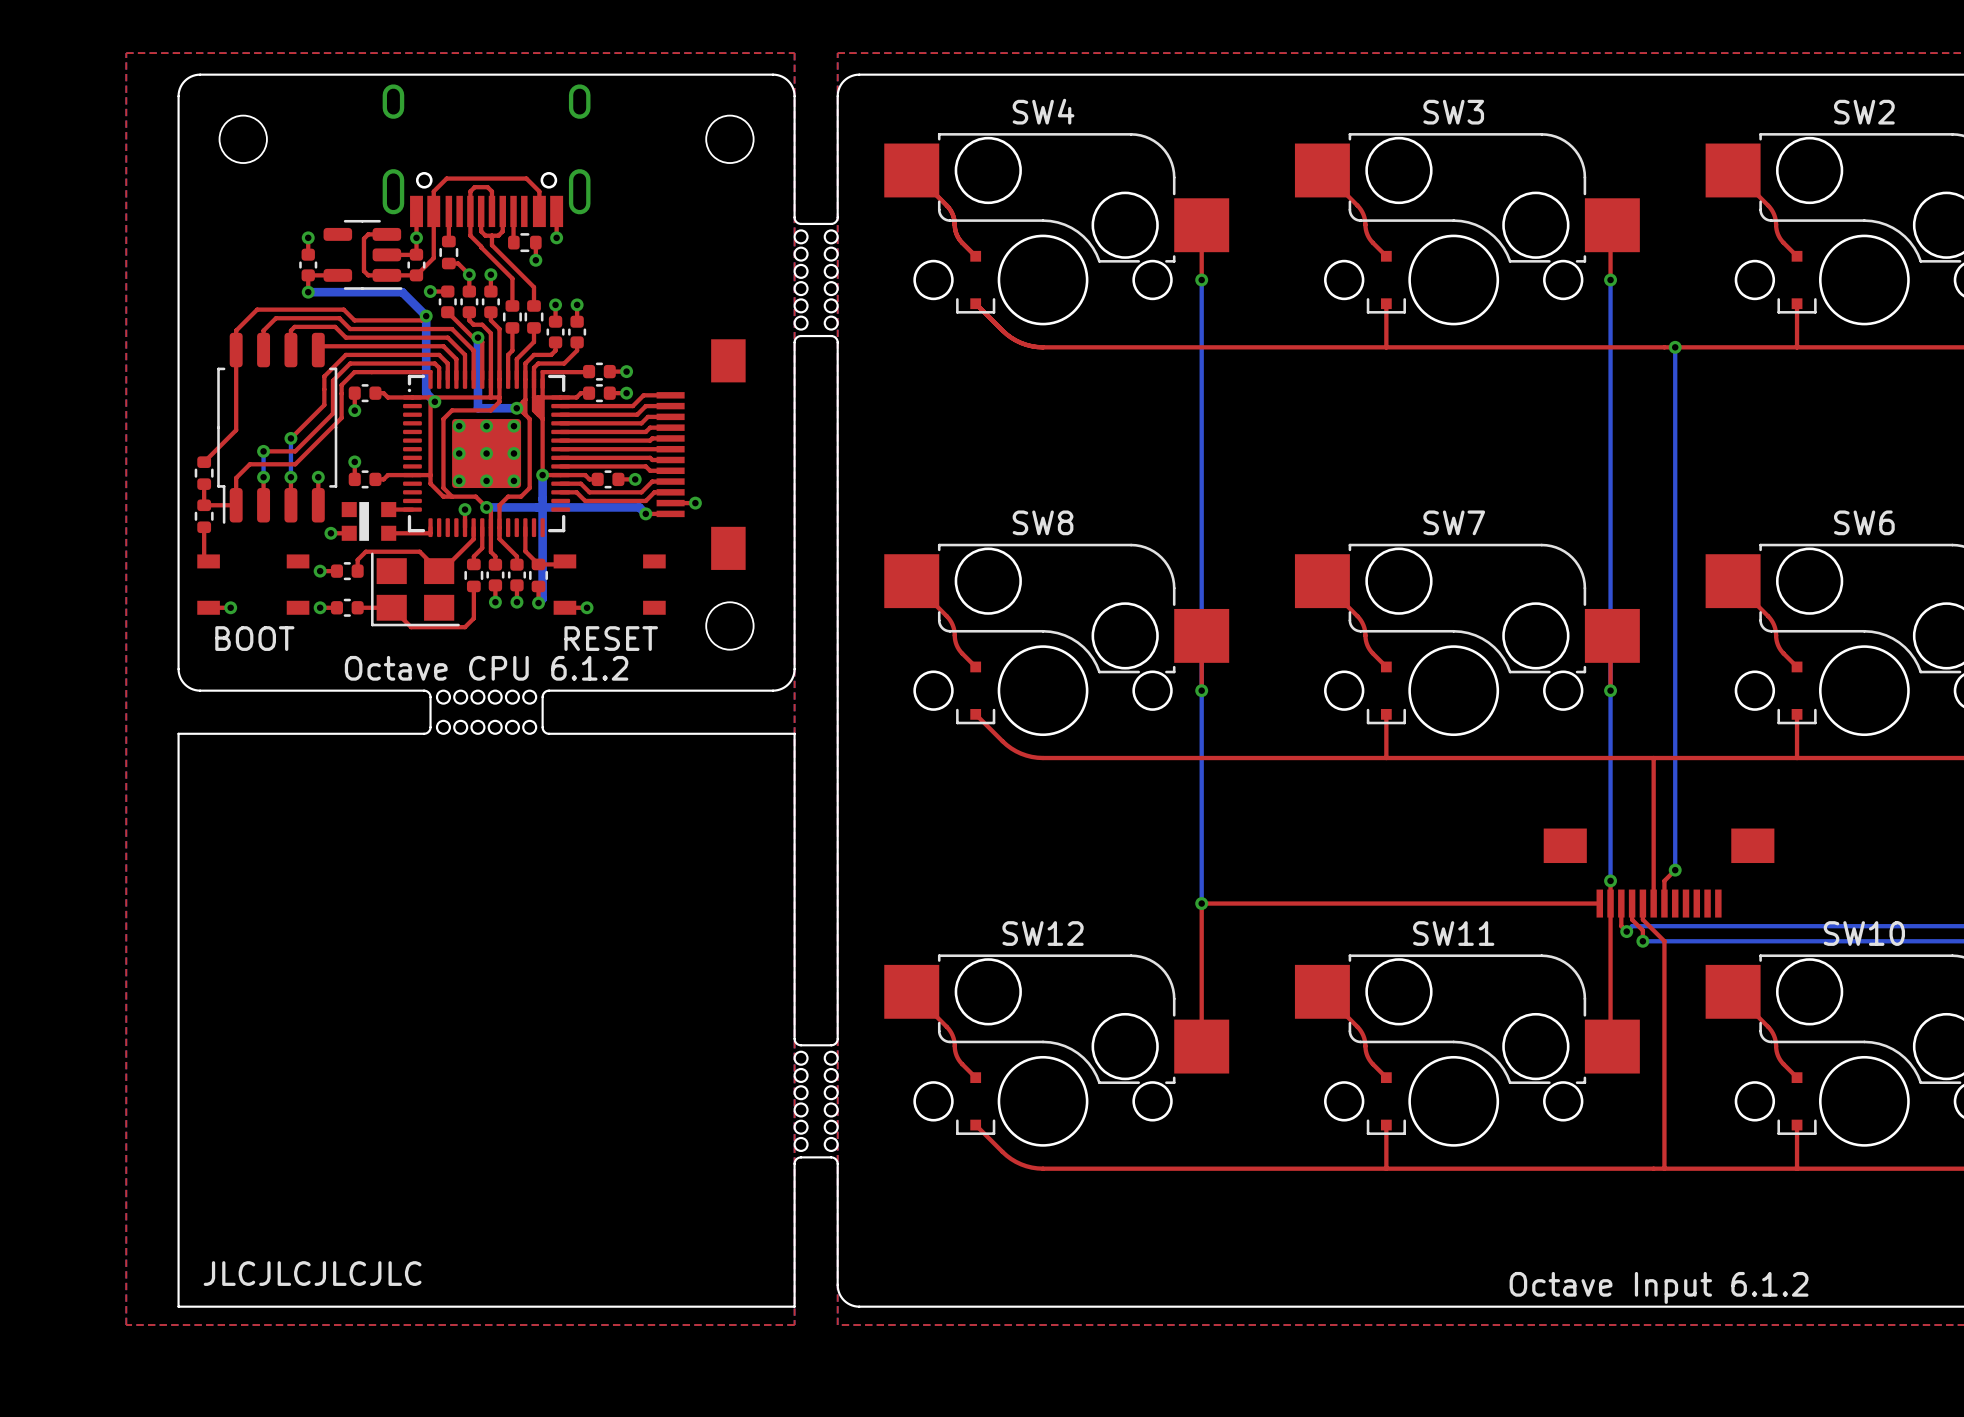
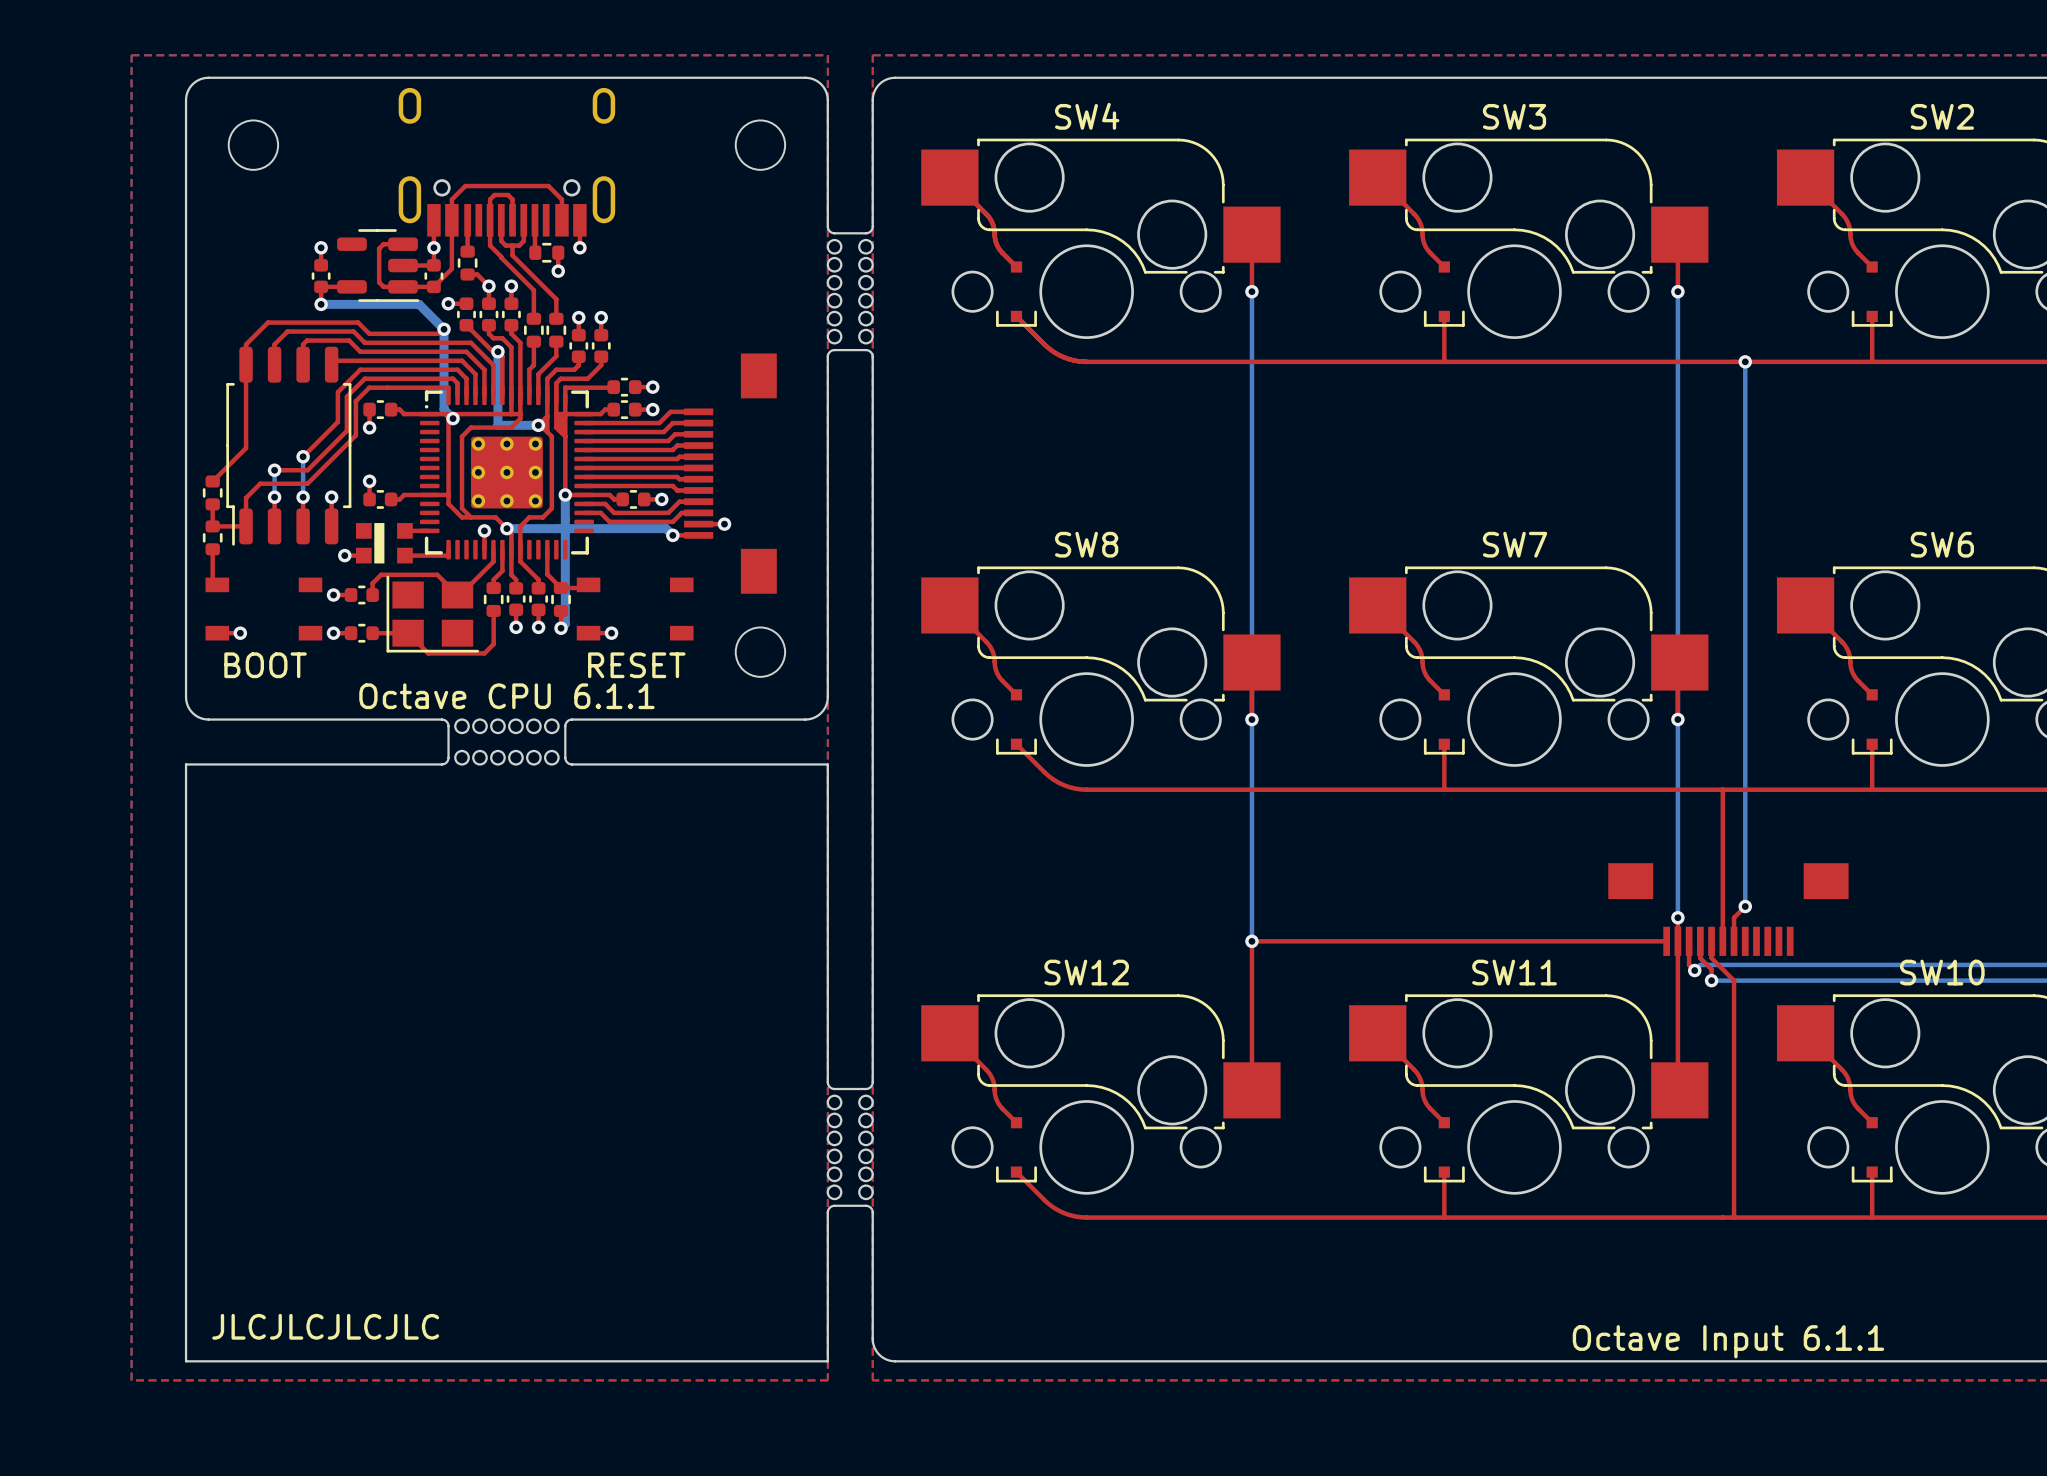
text: Octave CPU 6.1.2 (486, 668) -> Octave CPU 6.1.1 (506, 696)
text: Octave Input 6.1.2 (1659, 1287) -> Octave Input 6.1.1 (1728, 1341)

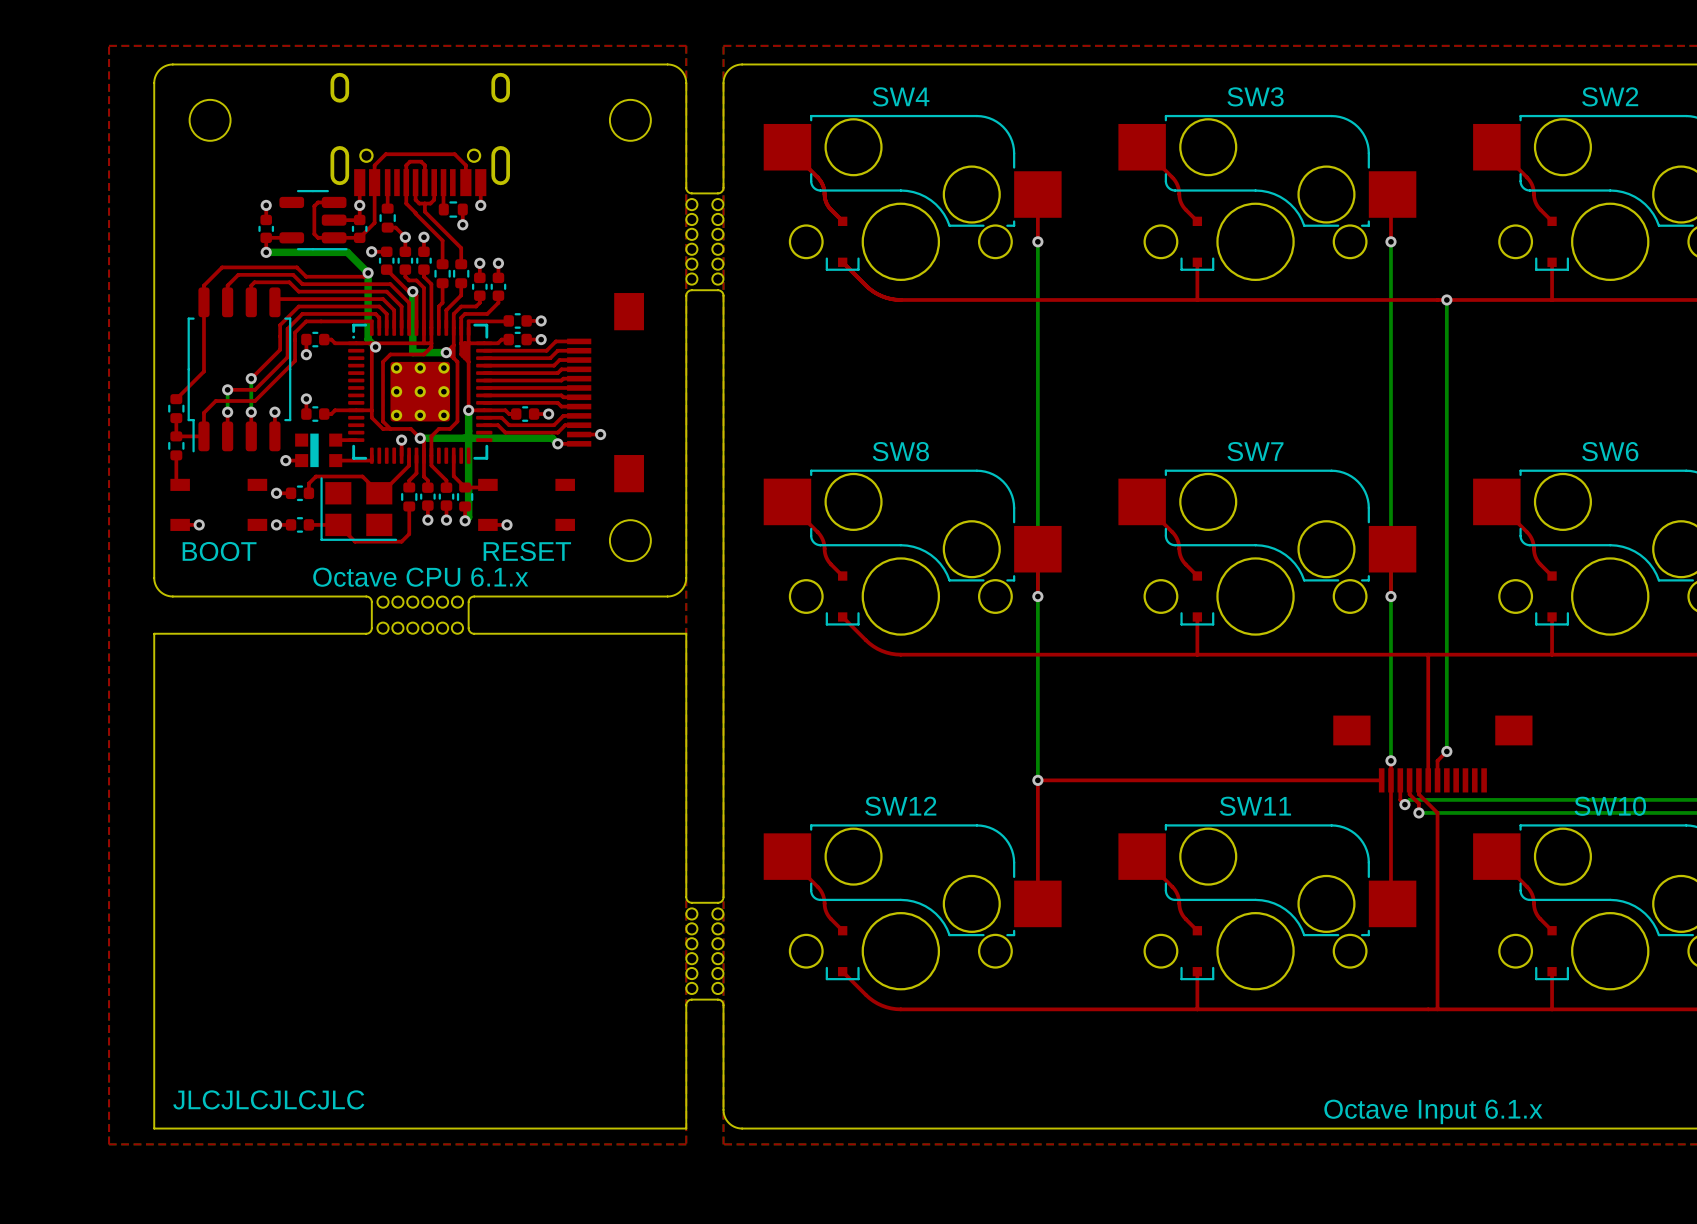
text: Octave CPU 6.1.1 (506, 696) -> Octave CPU 6.1.x (420, 577)
text: Octave Input 6.1.1 (1728, 1341) -> Octave Input 6.1.x (1433, 1111)

